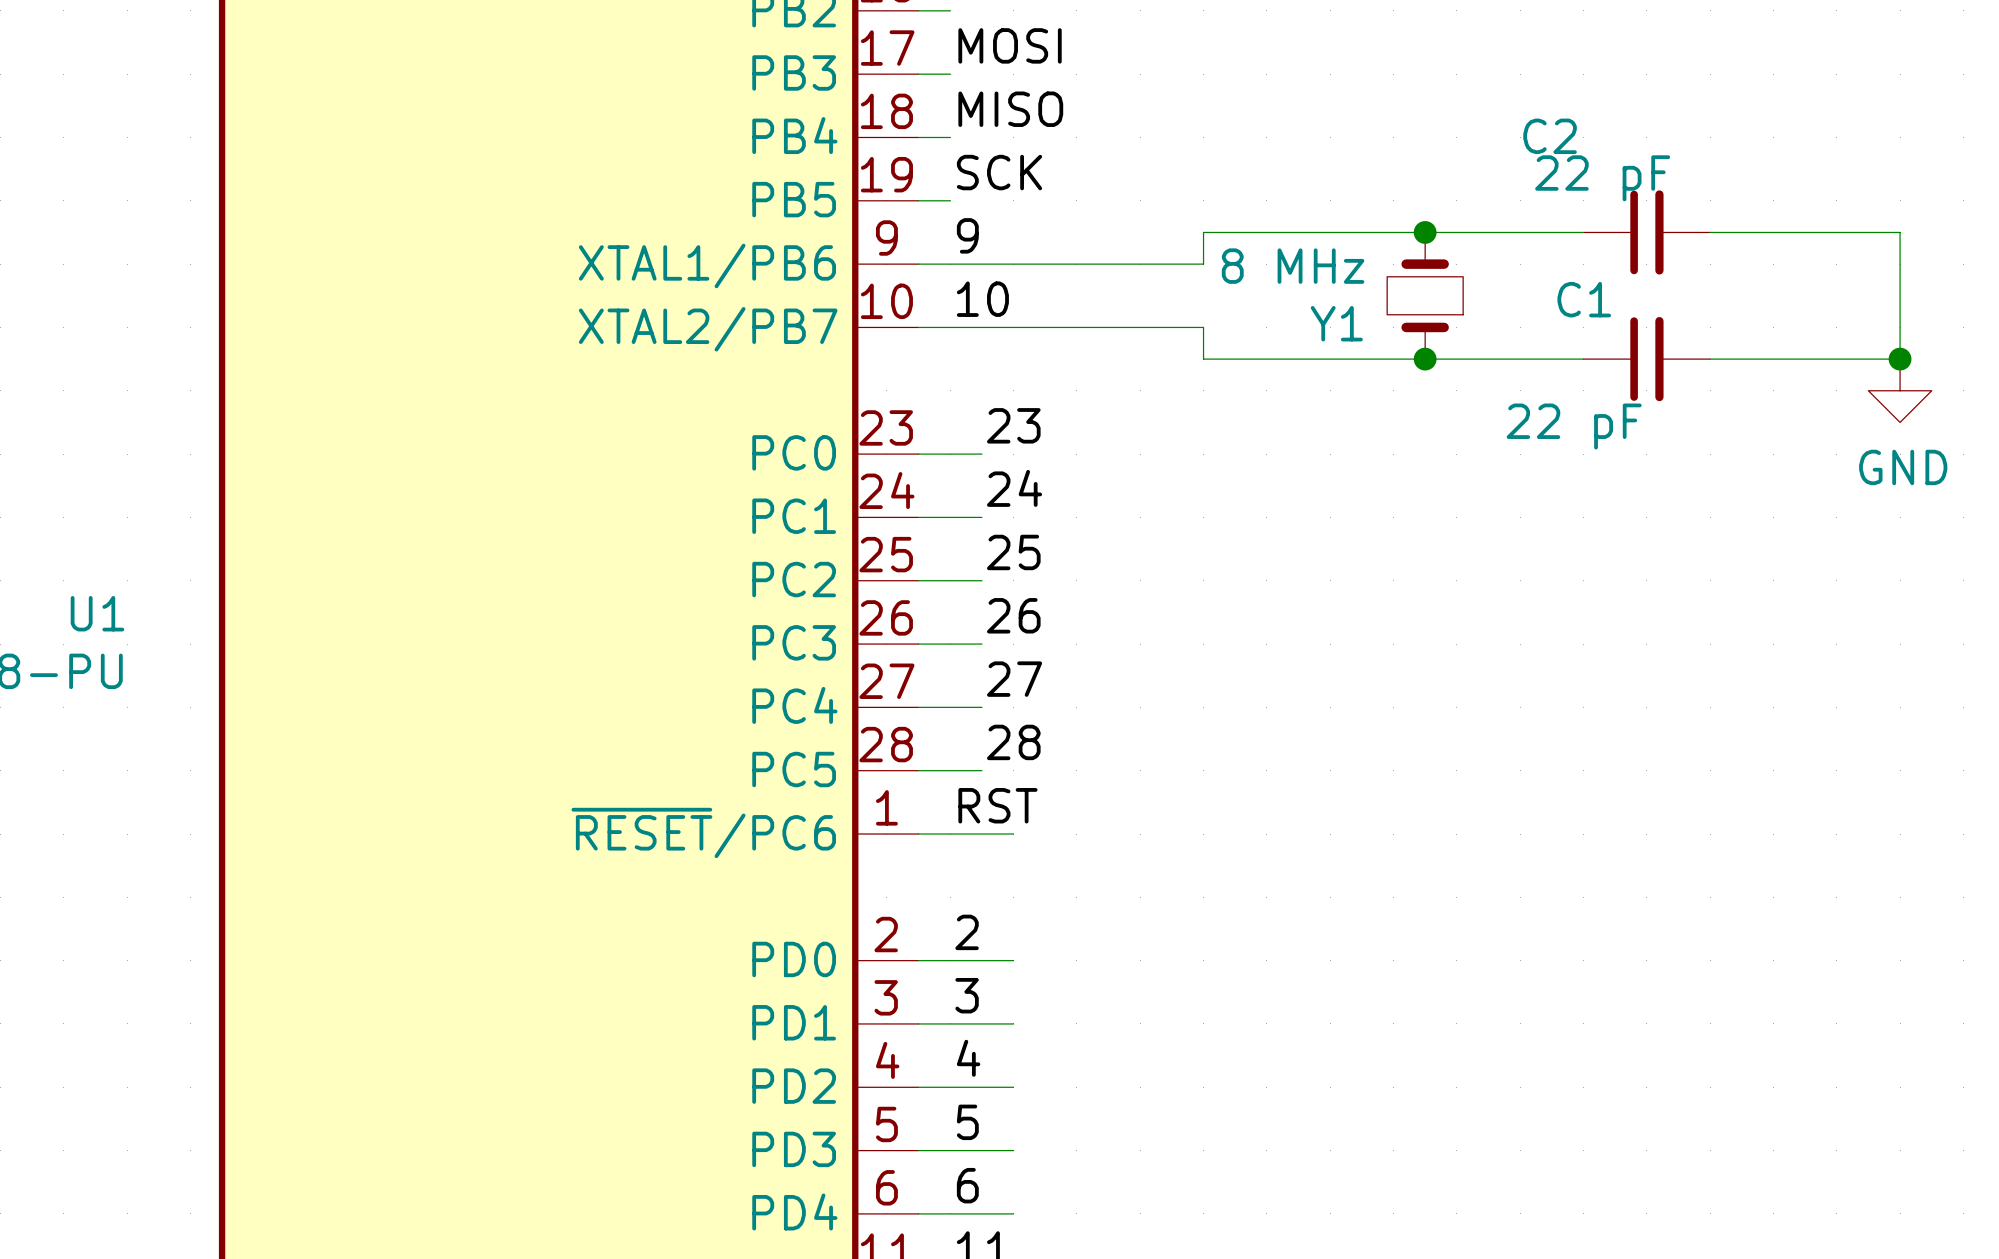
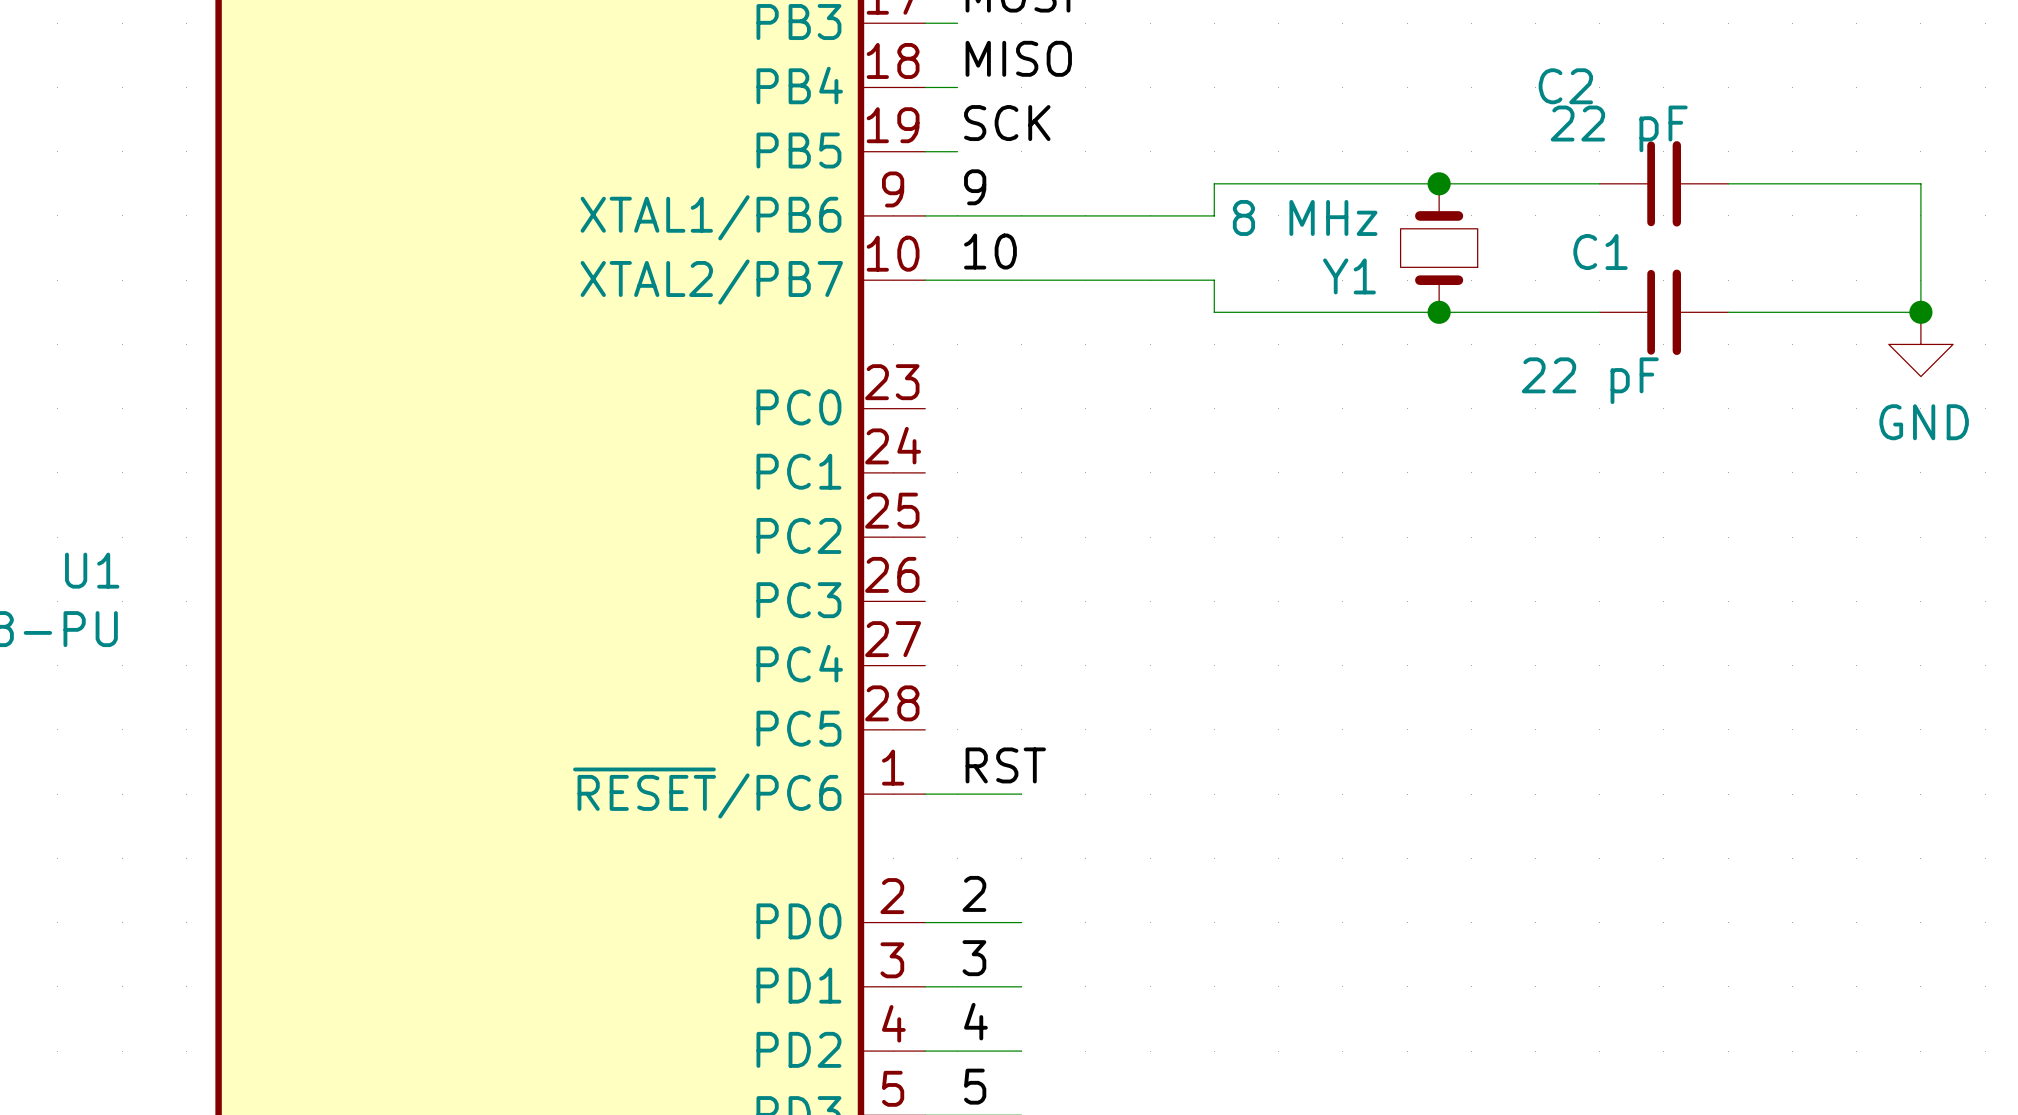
label: 23 (1013, 425) -> none
wire: (918, 454) (981, 454) -> none
label: 24 (1014, 488) -> none
wire: (918, 517) (981, 517) -> none
label: 25 (1013, 552) -> none
wire: (918, 580) (981, 580) -> none
label: 26 (1013, 615) -> none
wire: (918, 644) (981, 644) -> none
label: 27 (1014, 679) -> none
wire: (918, 707) (981, 707) -> none
label: 28 (1013, 742) -> none
wire: (918, 770) (981, 770) -> none

